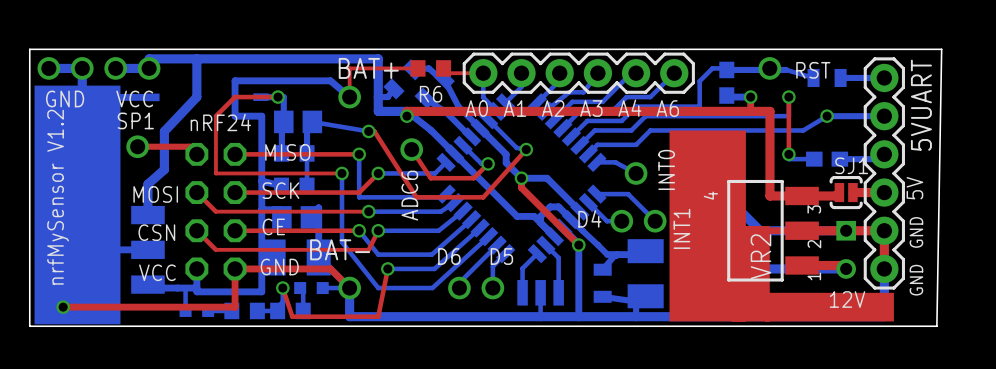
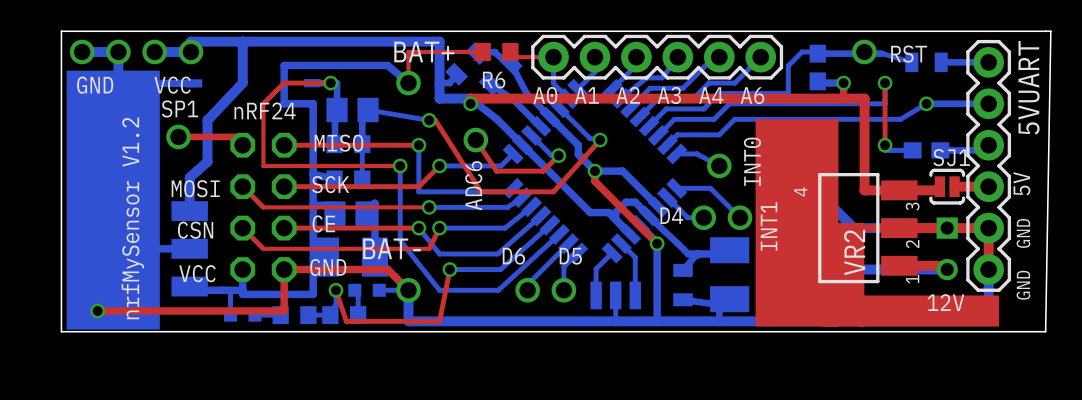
text position: nrfMySensor V1.2 (58, 197) -> nrfMySensor V1.2 (132, 218)

